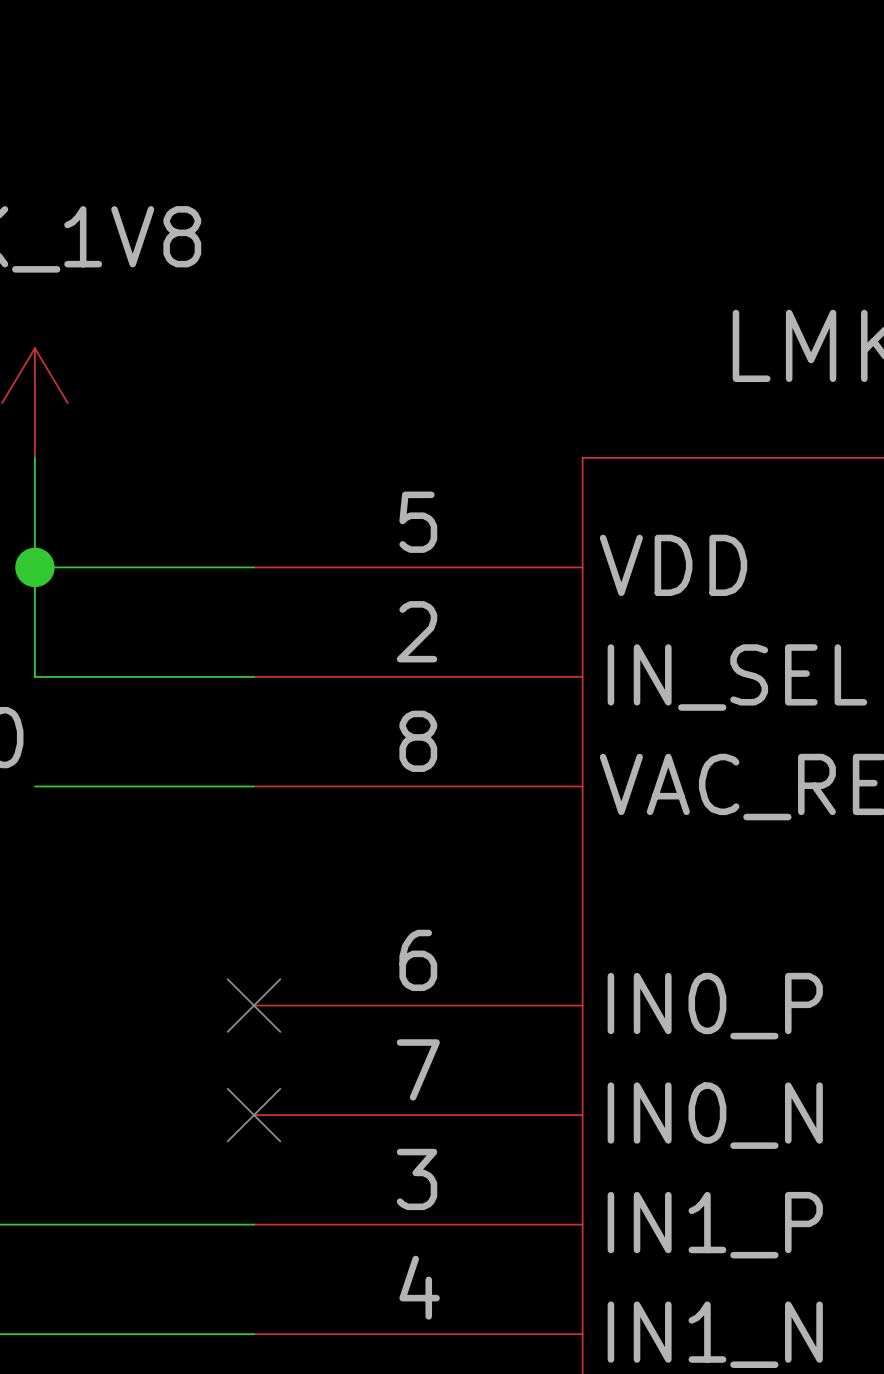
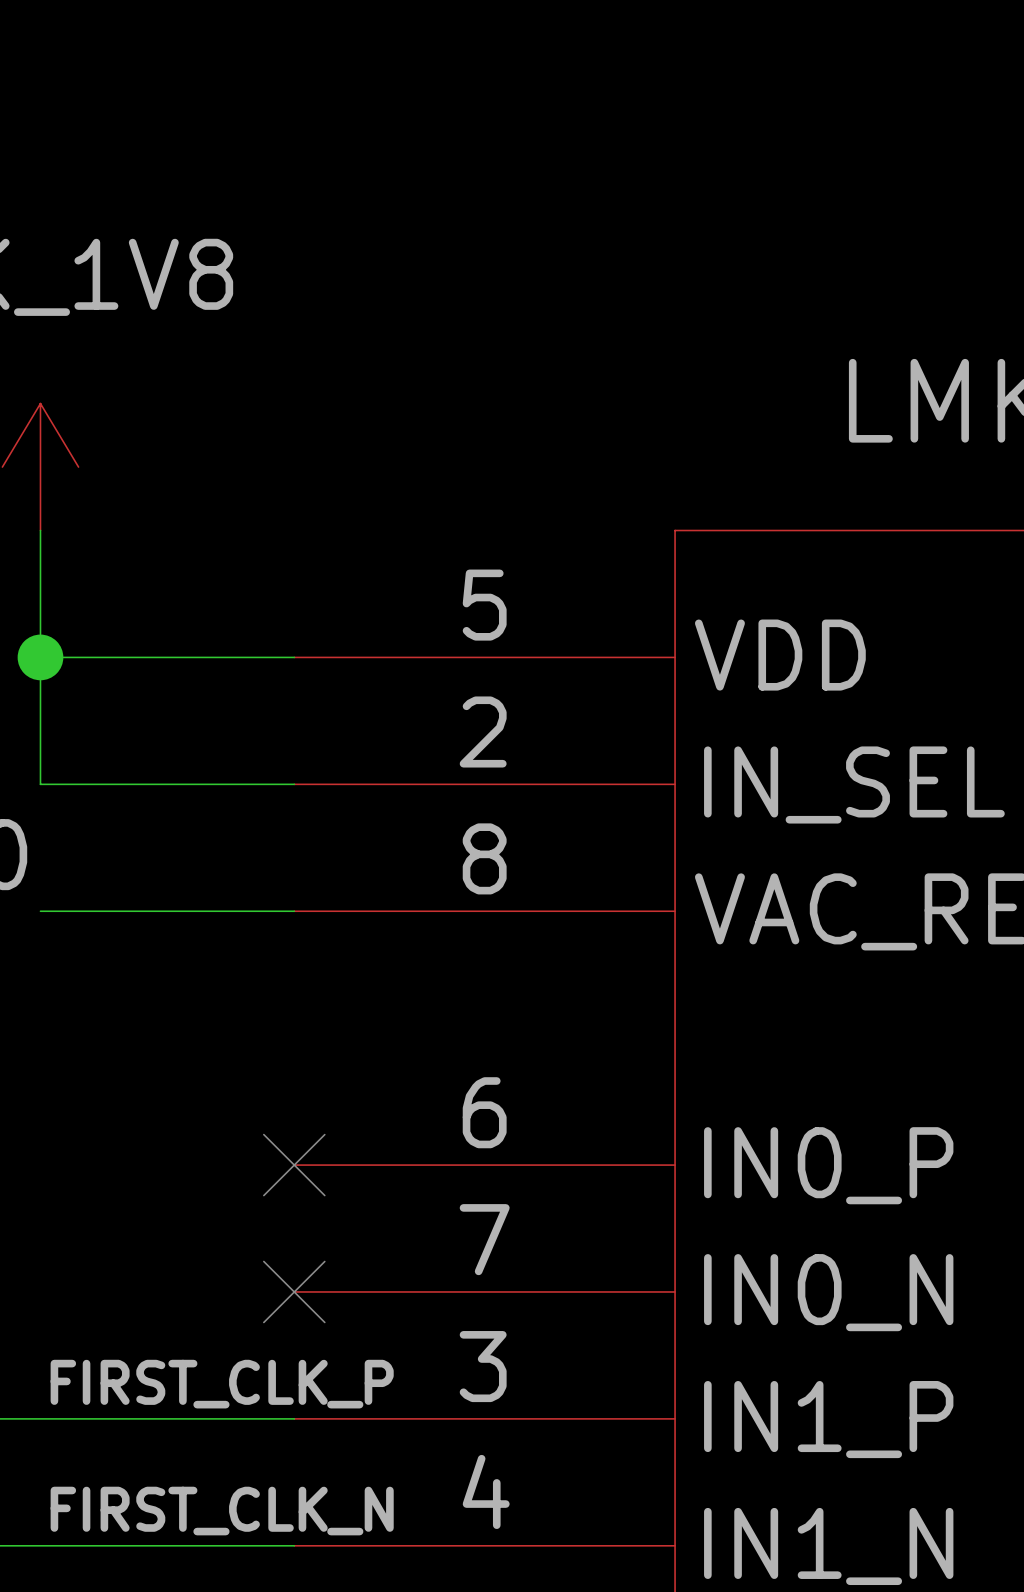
label: none -> FIRST_CLK_P (222, 1384)
label: none -> FIRST_CLK_N (222, 1511)

